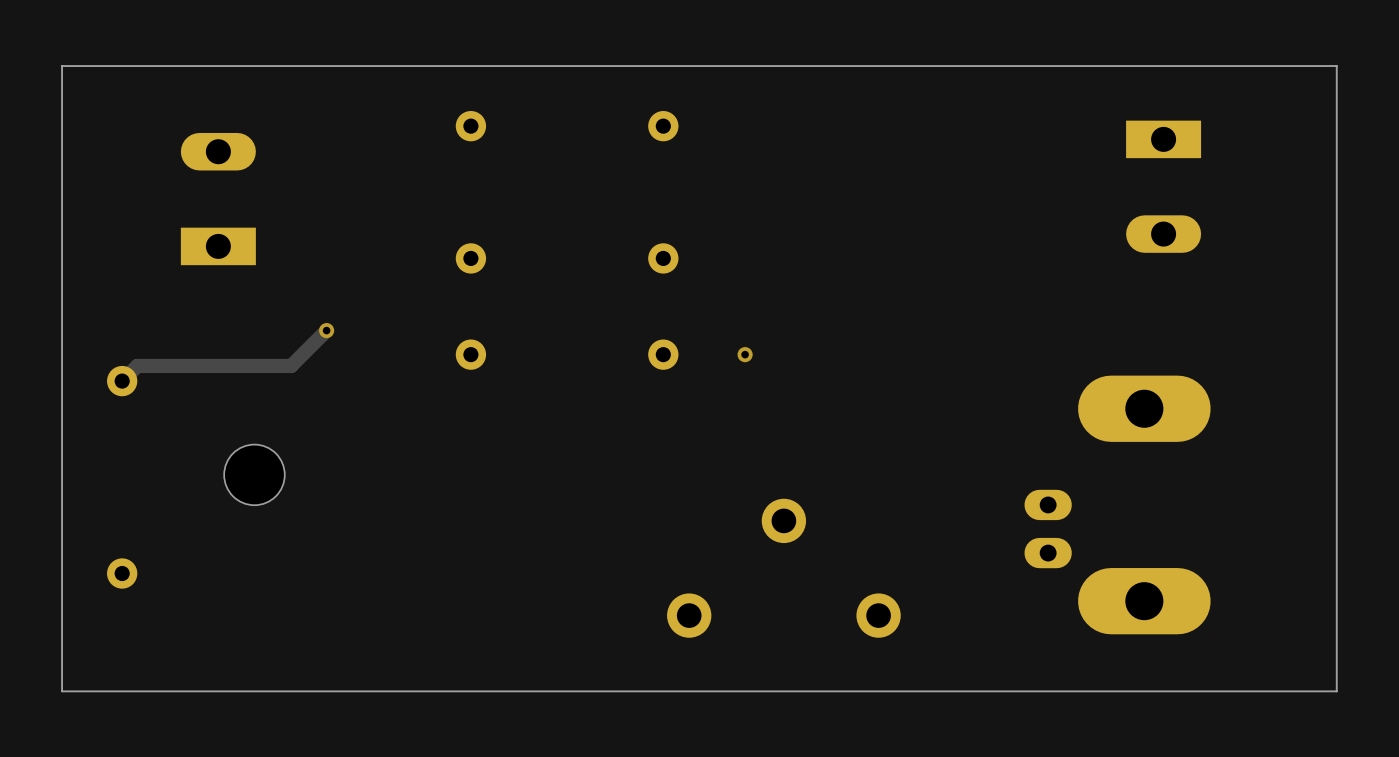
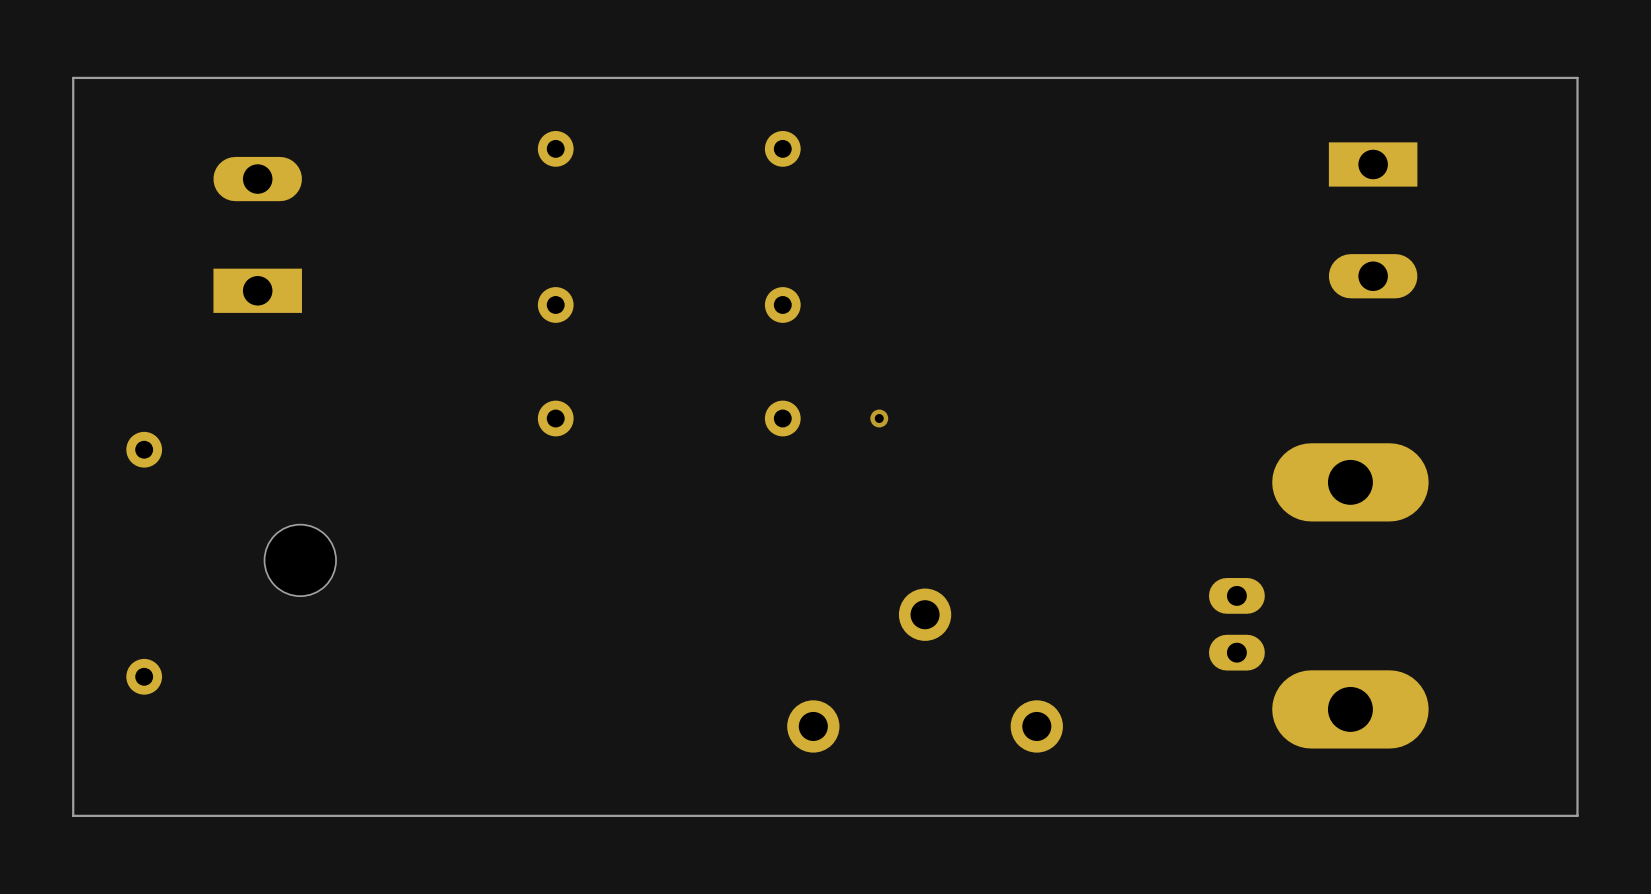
track: (326, 330) (291, 365) (137, 365) (122, 381) -> none
via: (326, 330) -> none

